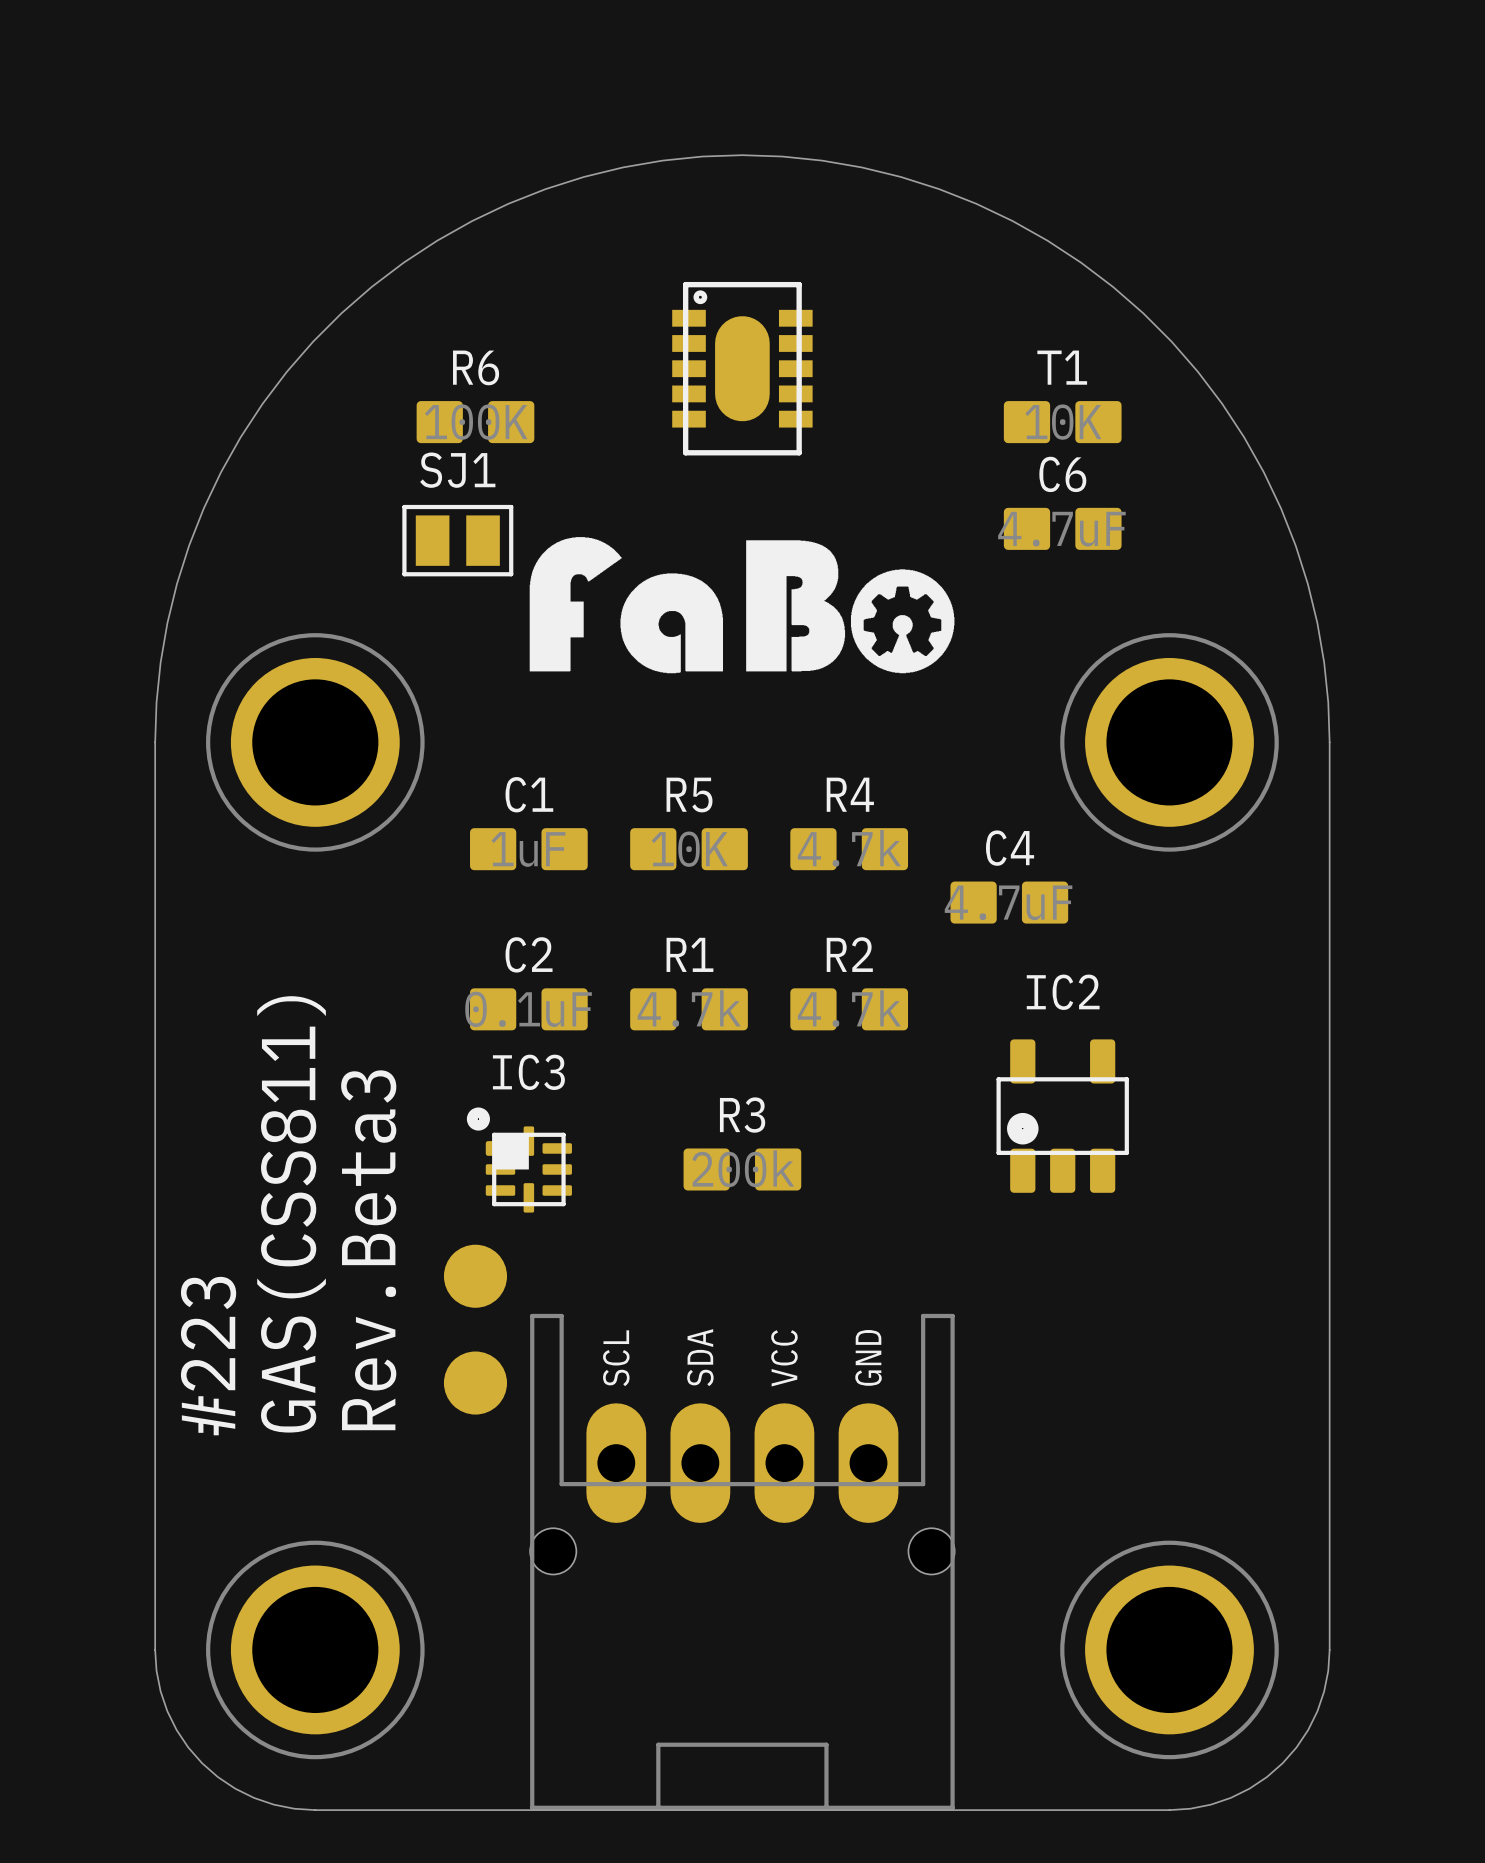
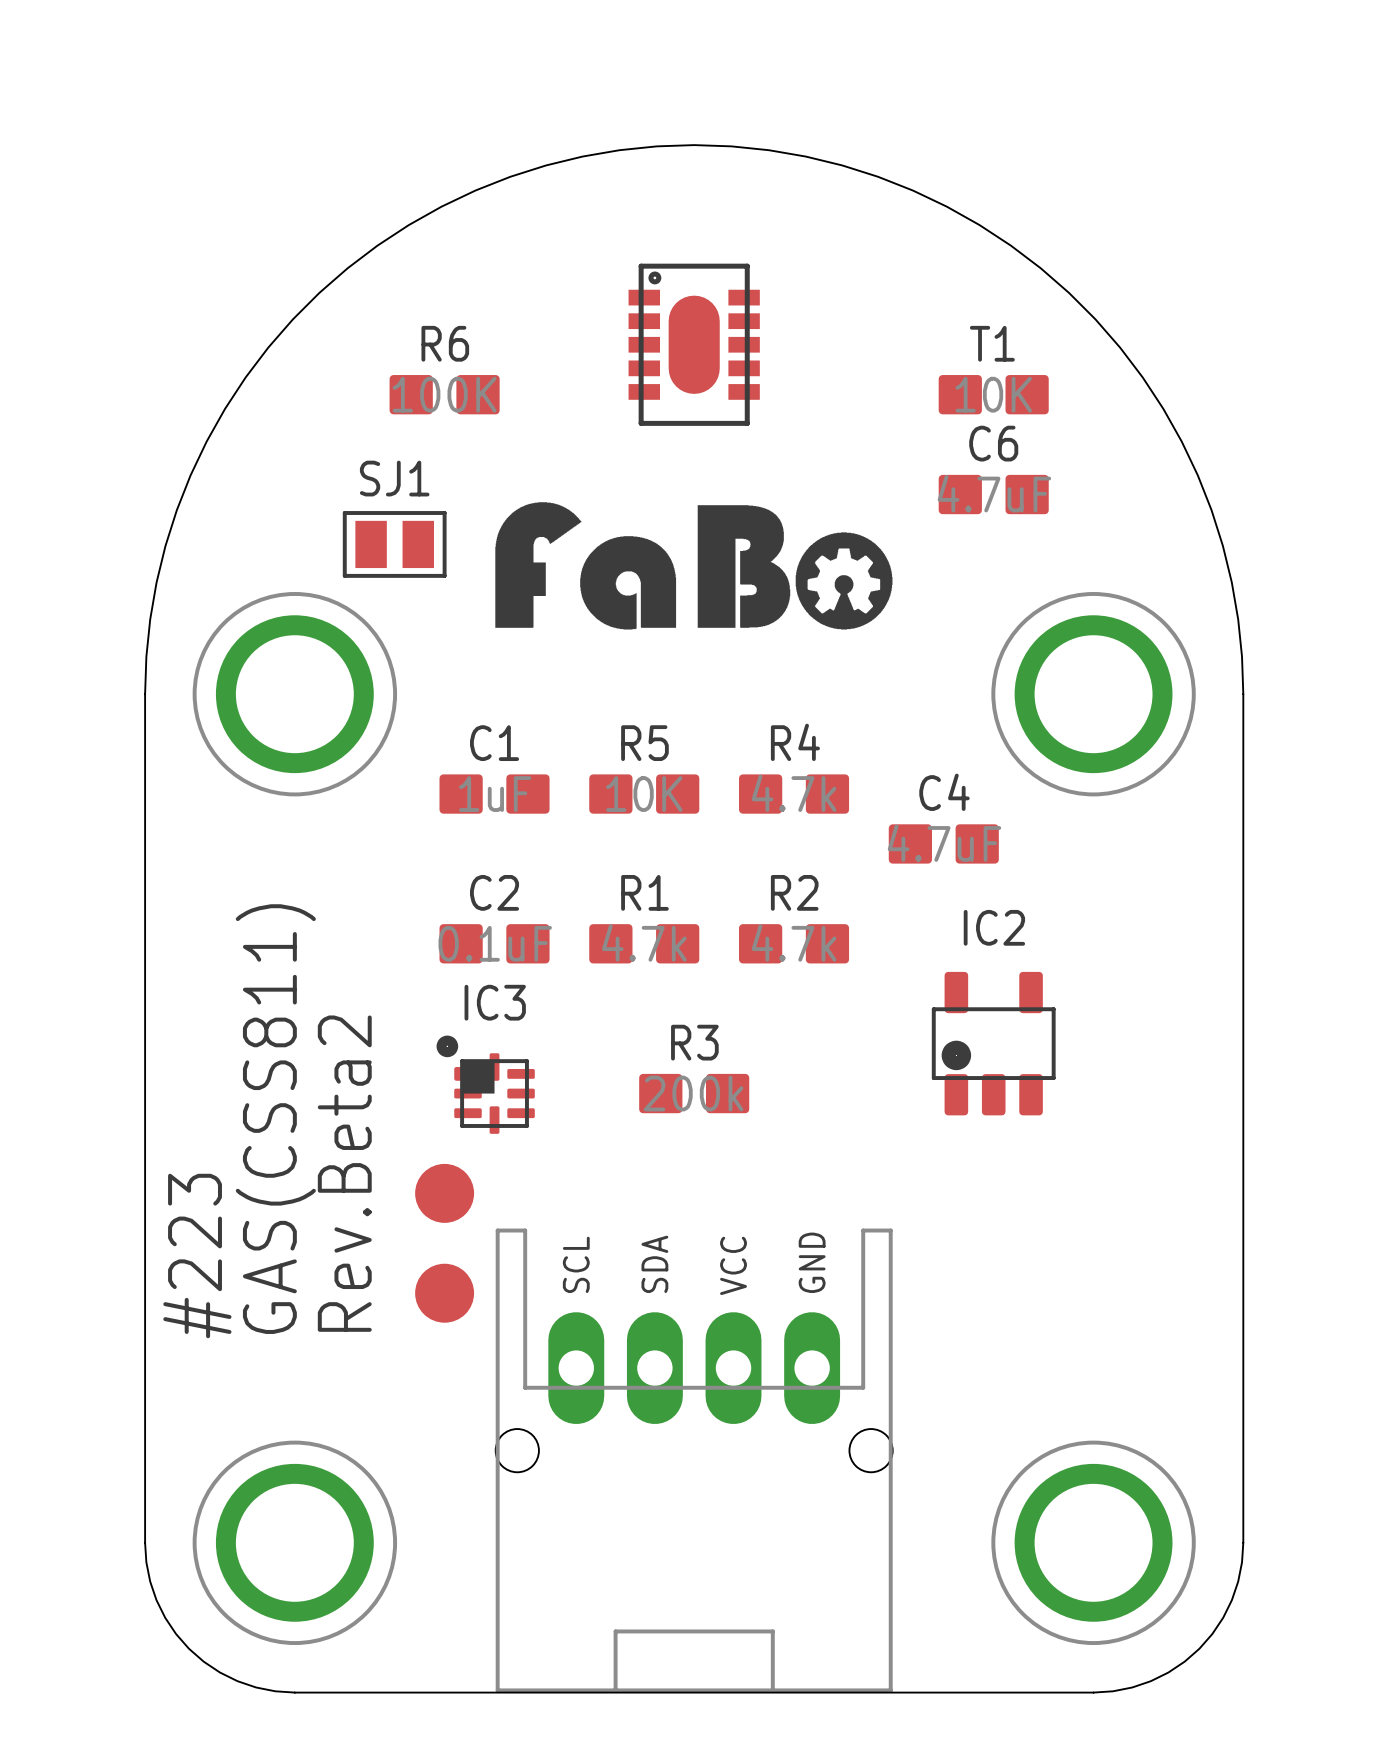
SJ1 position: (457, 540) -> (394, 544)
text: Rev.Beta3 (368, 1250) -> Rev.Beta2 (344, 1173)

